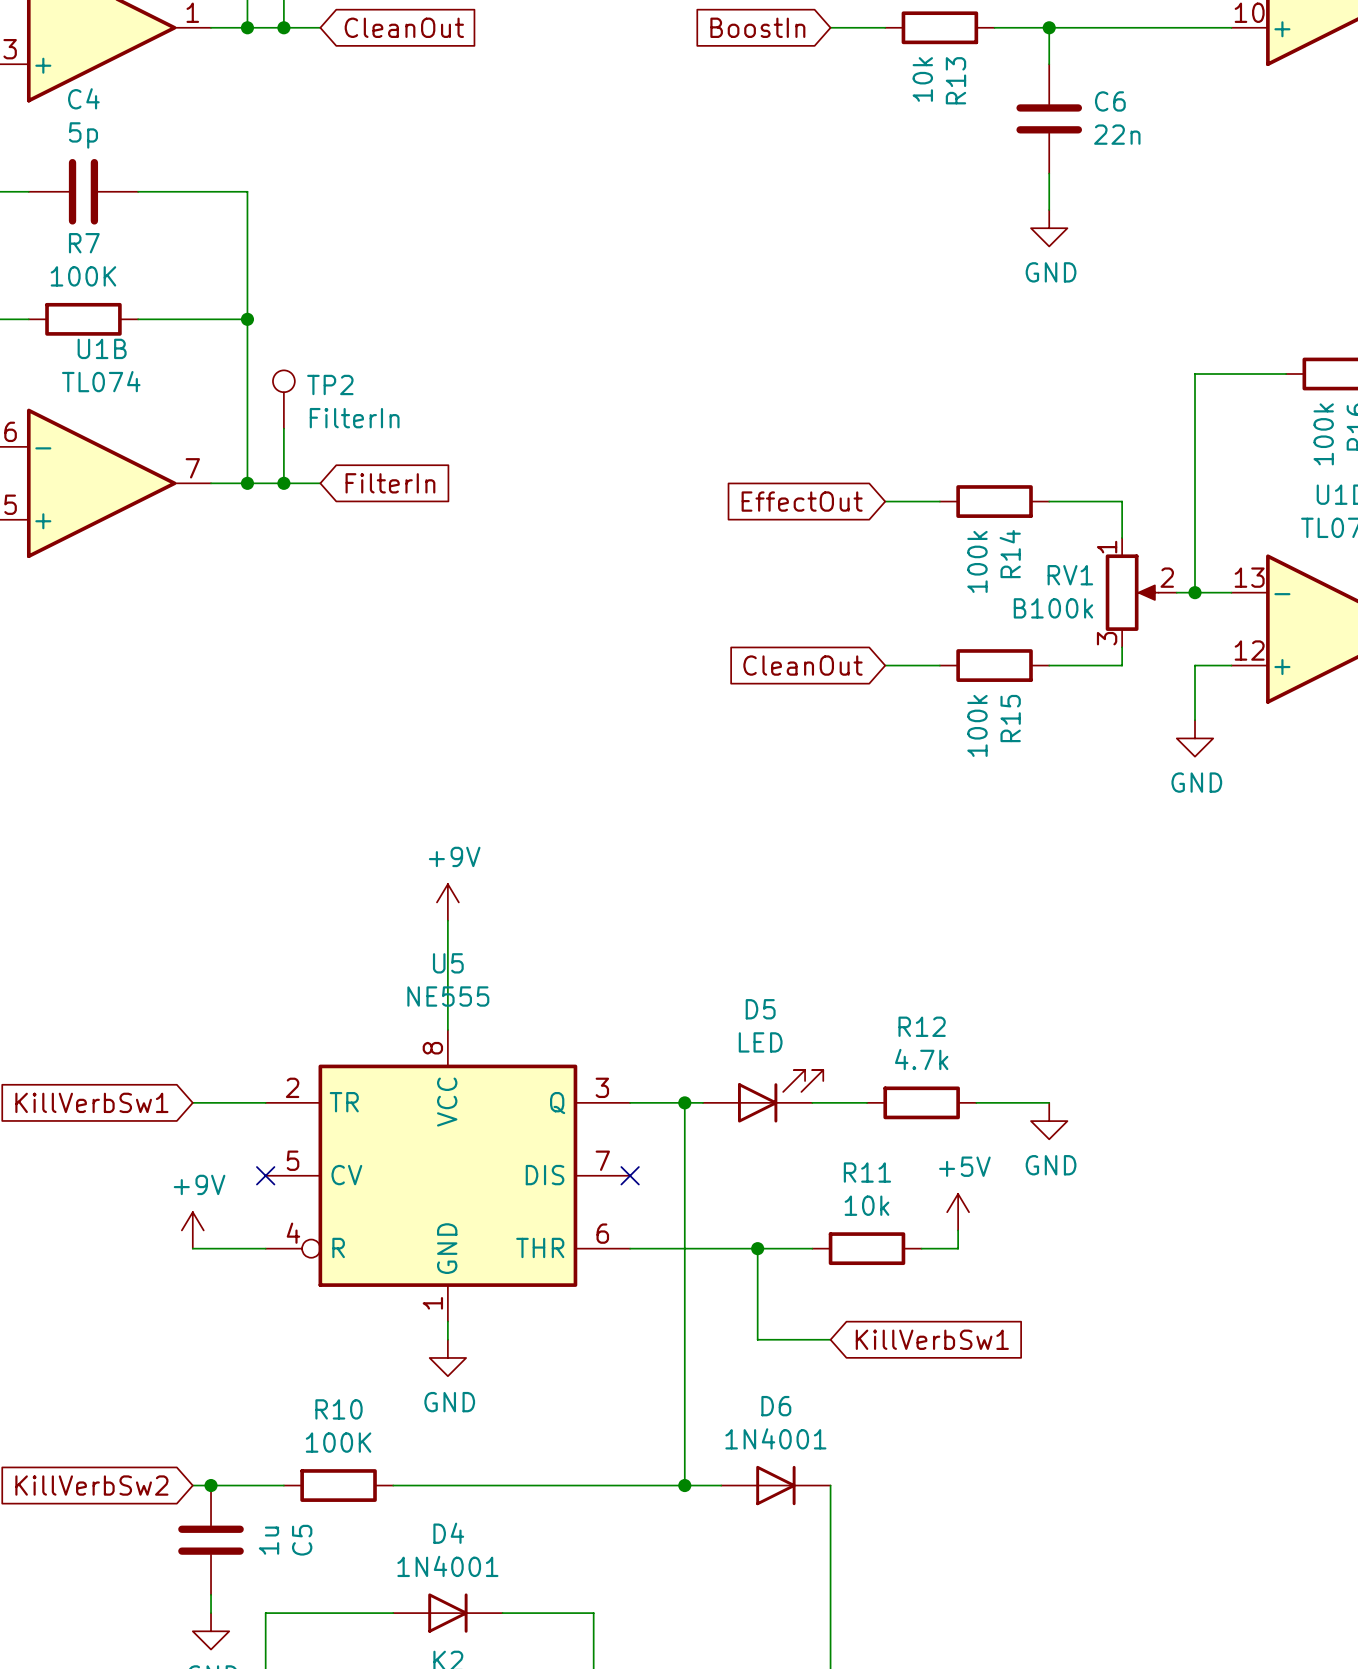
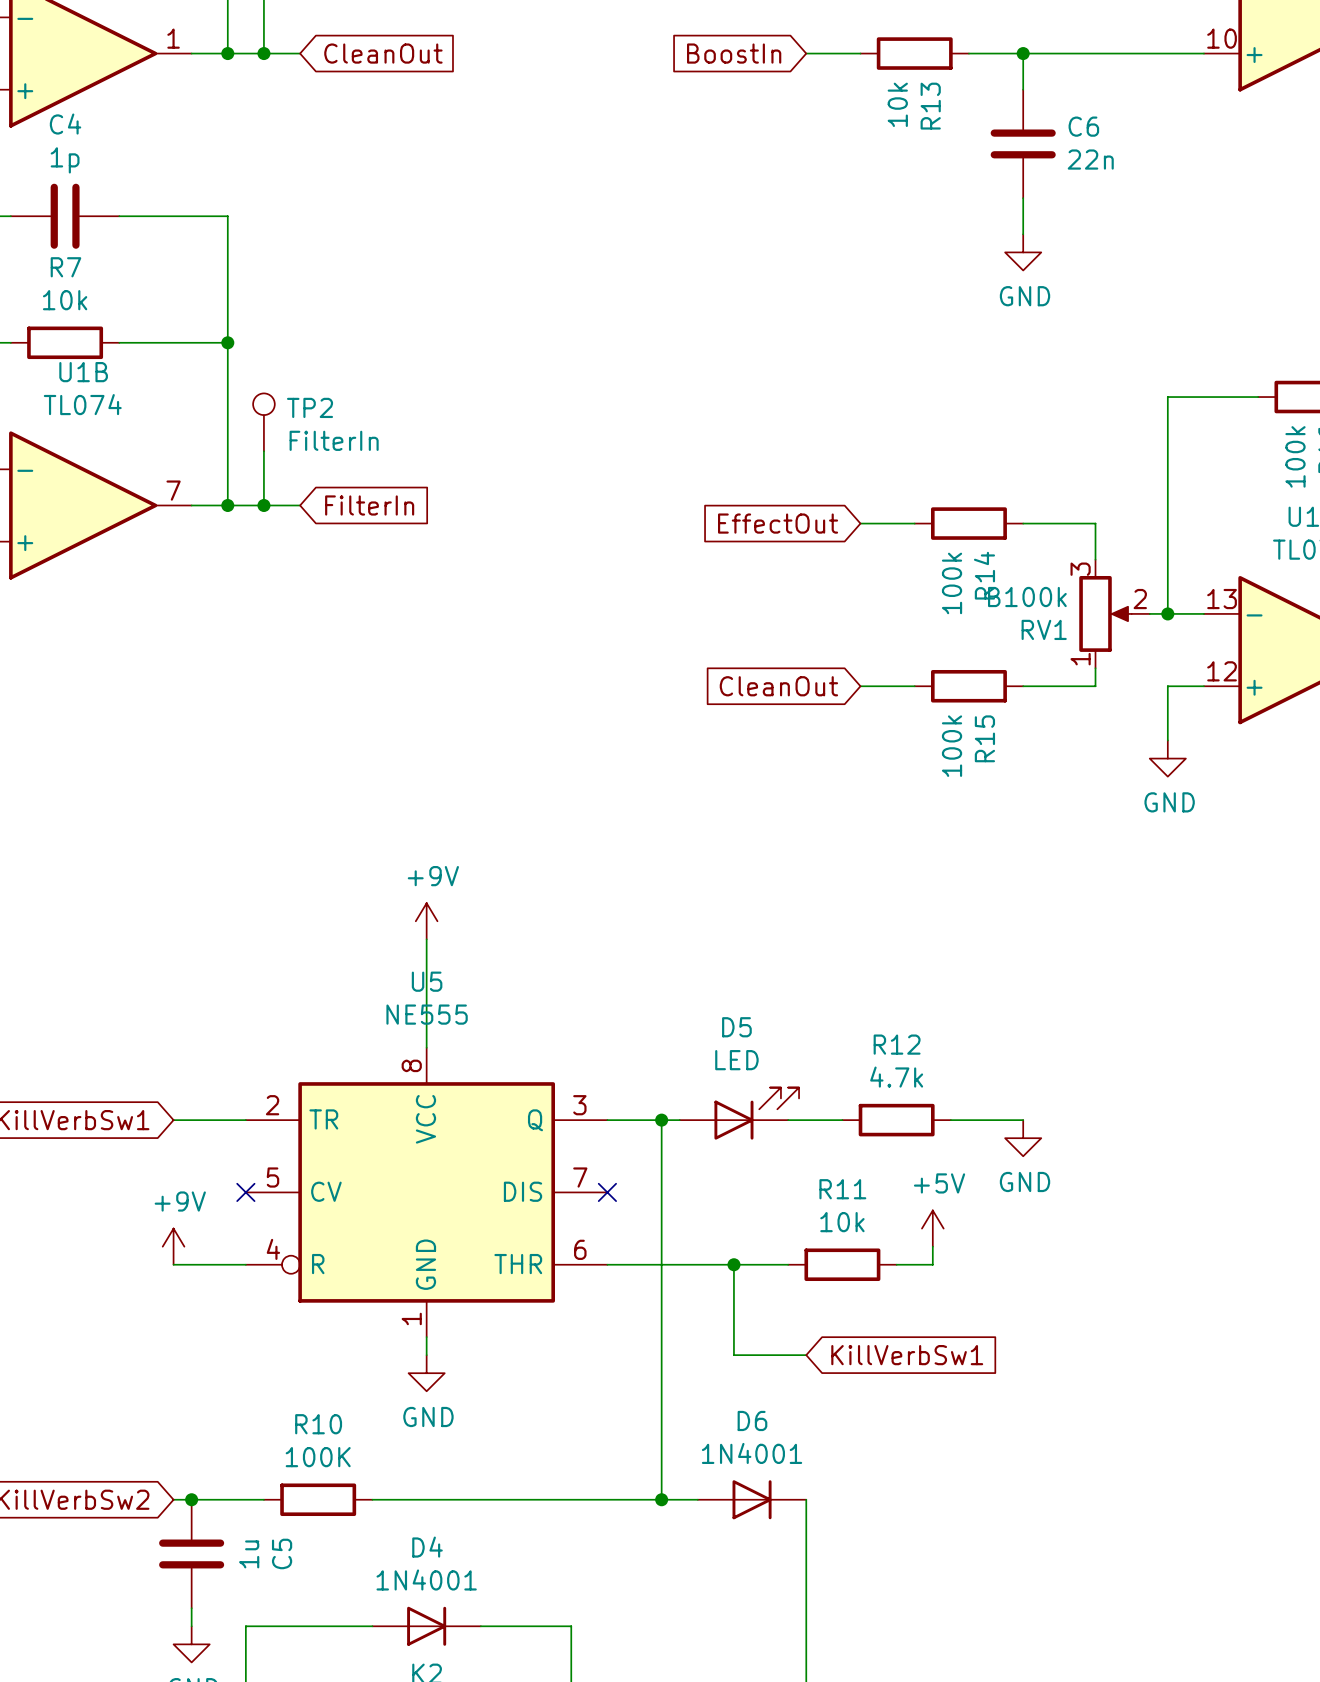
C4 value: 5p (83, 135) -> 1p (65, 160)
R7 value: 100K (83, 276) -> 10k (65, 300)
RV1 flip: as is (1132, 592) -> up-down (1105, 613)

